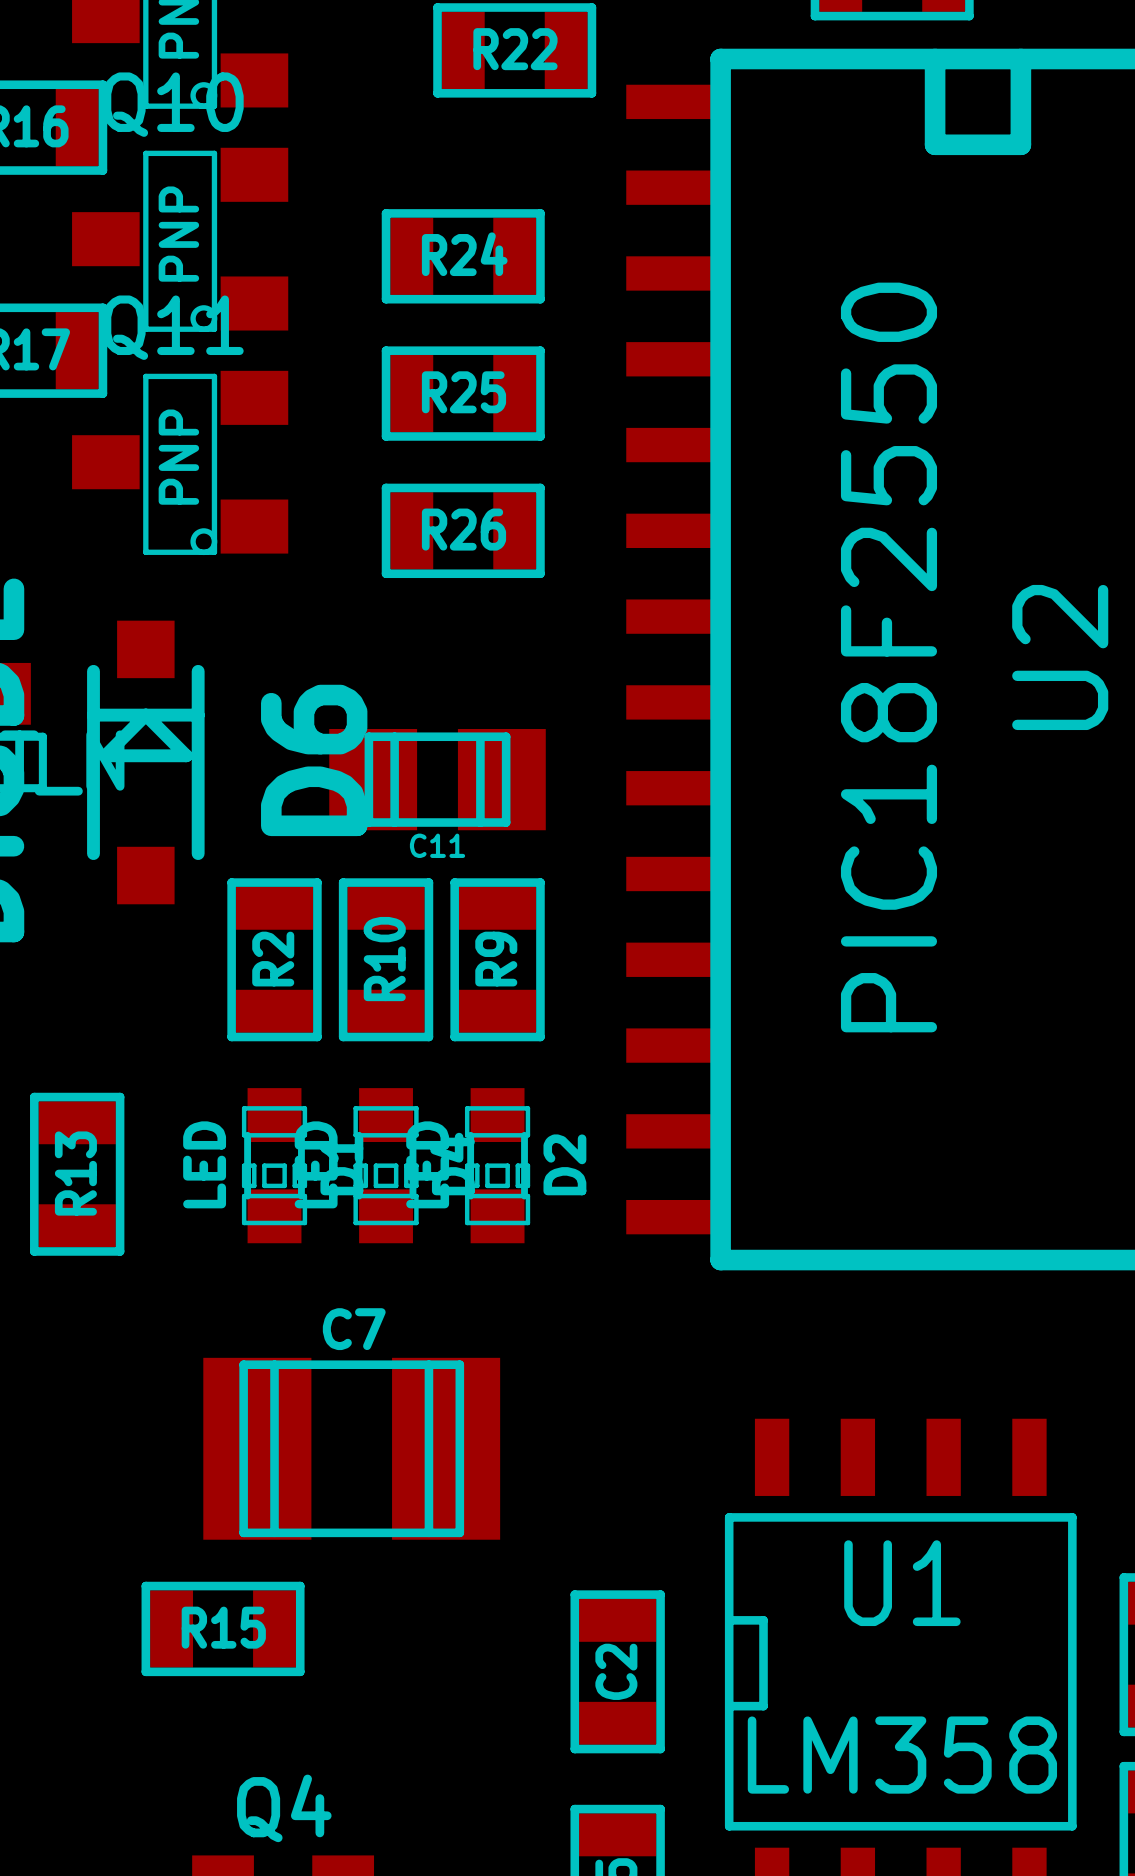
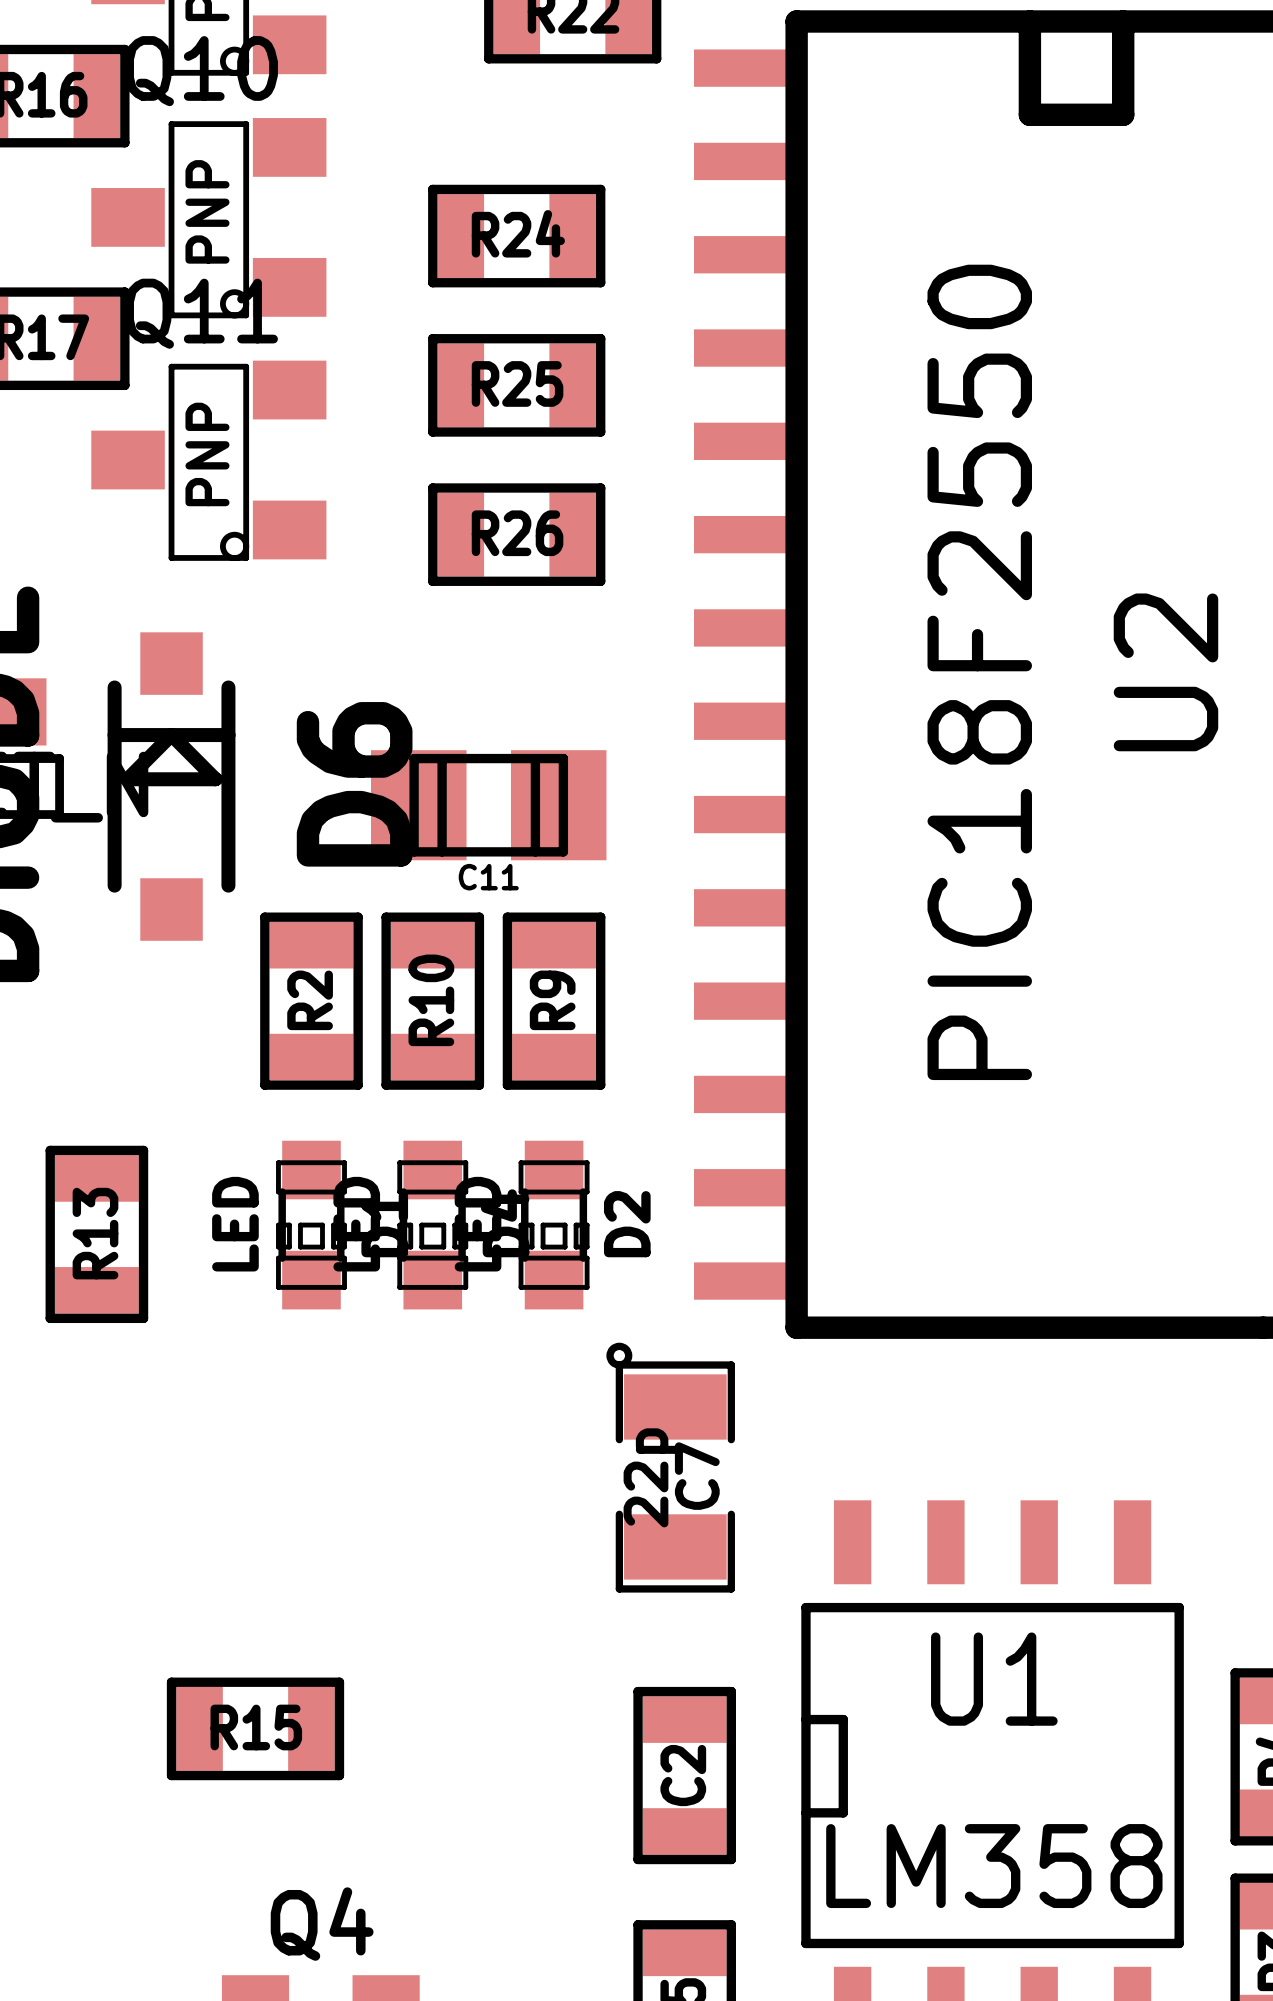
C7 footprint: [203, 1357, 501, 1540] -> [606, 1342, 735, 1593]
C7 value: none -> 22p (652, 1477)

